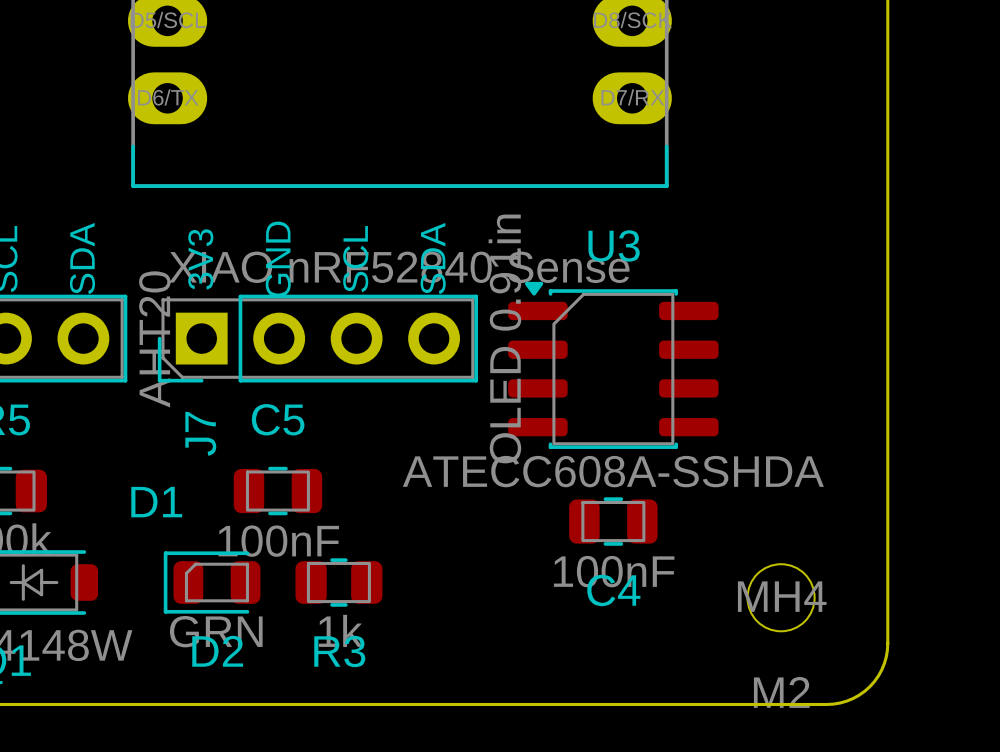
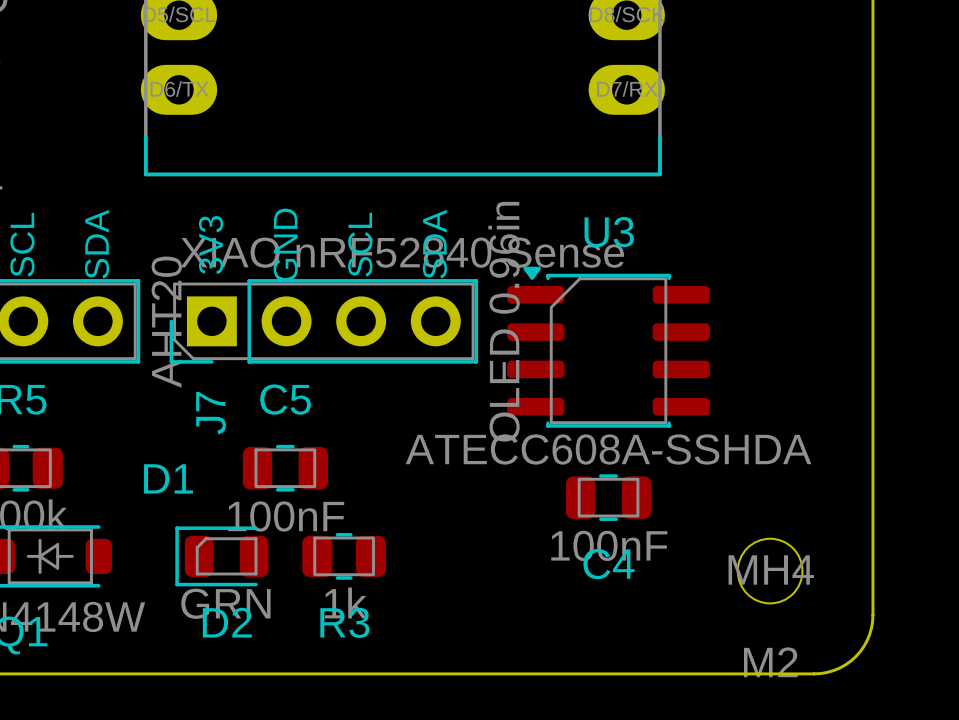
J7 value: OLED 0.91in (504, 338) -> OLED 0.96in (504, 321)

